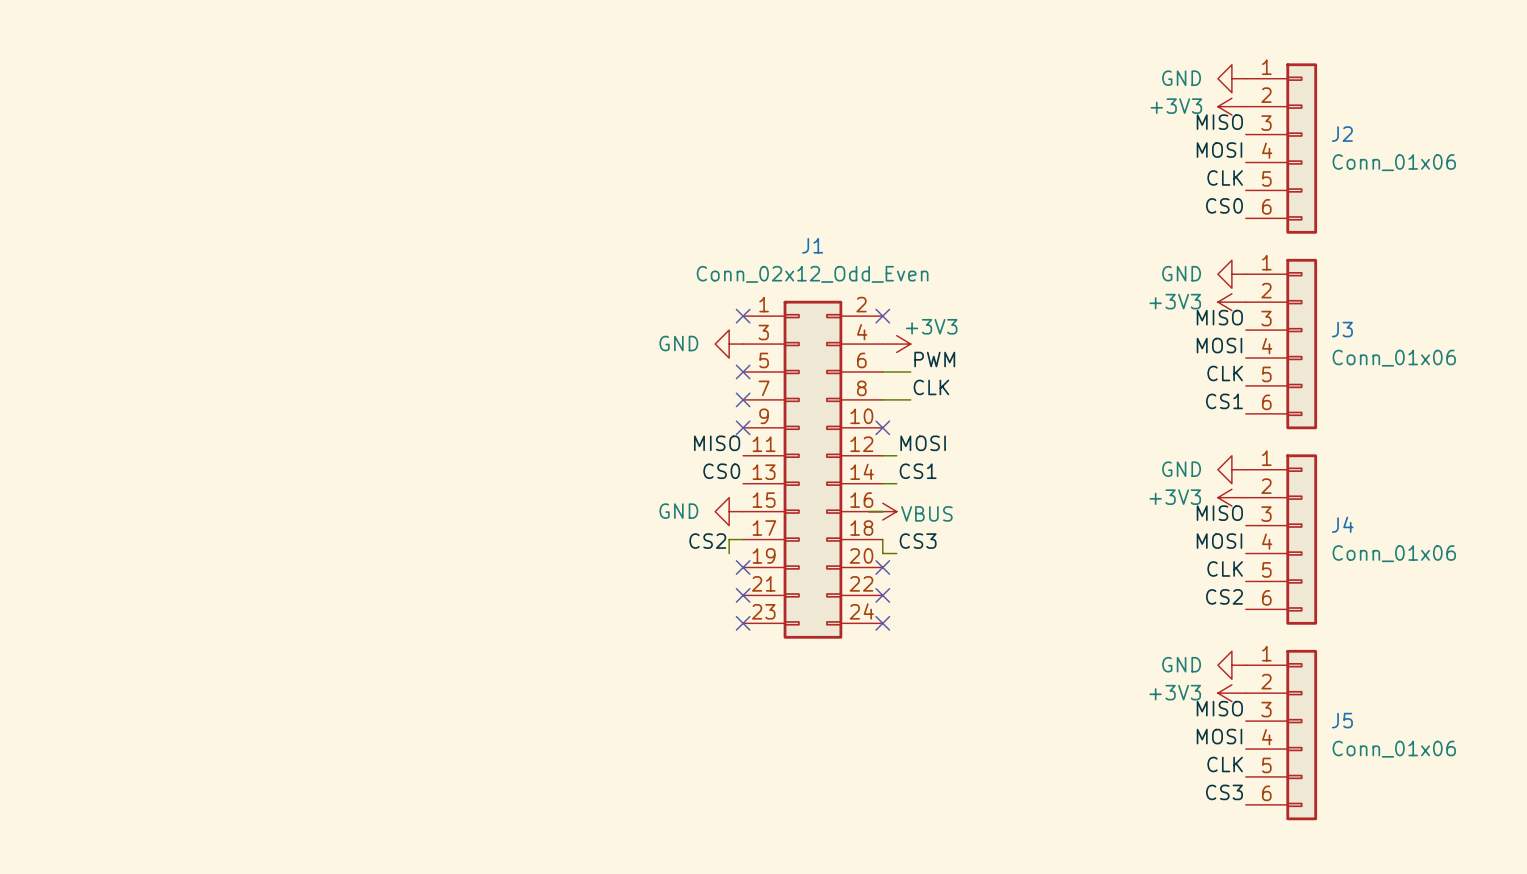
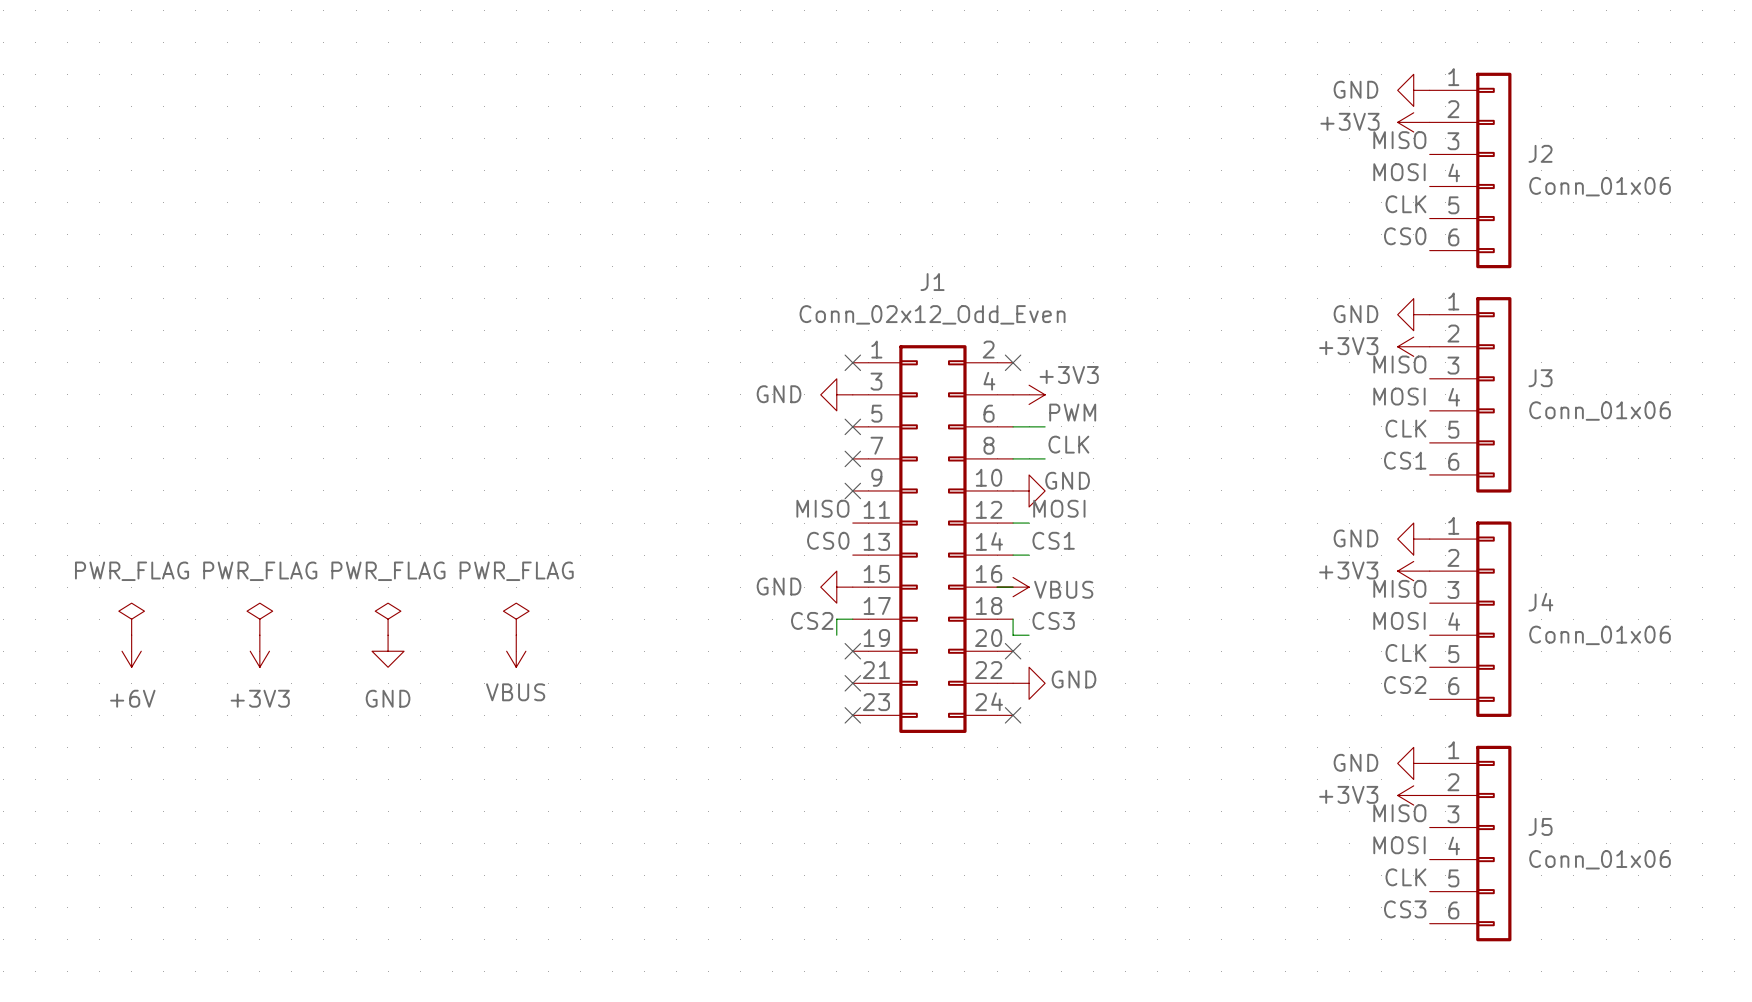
no-connect mark: (882, 427) -> none
power symbol: none -> GND (1029, 490)
power symbol: none -> PWR_FLAG (131, 619)
power symbol: none -> PWR_FLAG (259, 619)
power symbol: none -> PWR_FLAG (388, 619)
power symbol: none -> PWR_FLAG (516, 619)
power symbol: none -> +6V (131, 651)
power symbol: none -> +3V3 (259, 651)
power symbol: none -> GND (388, 651)
power symbol: none -> VBUS (516, 651)
no-connect mark: (882, 595) -> none
power symbol: none -> GND (1029, 683)

